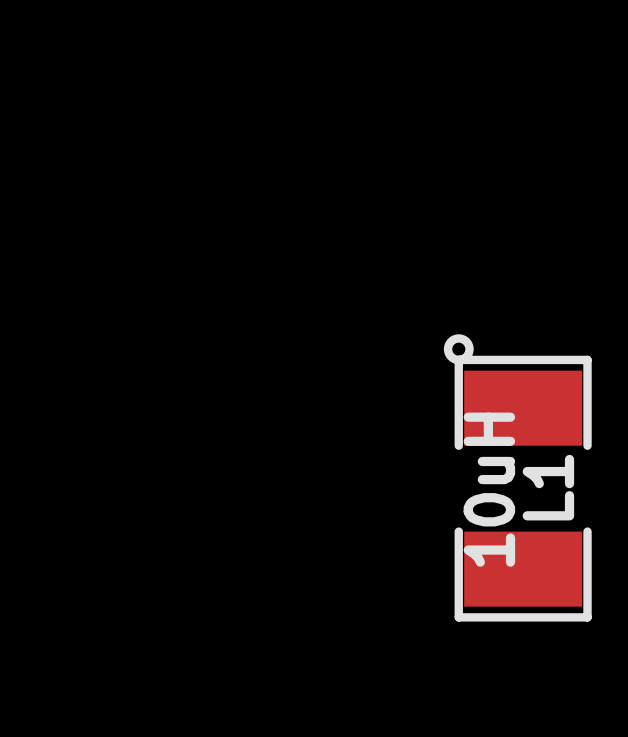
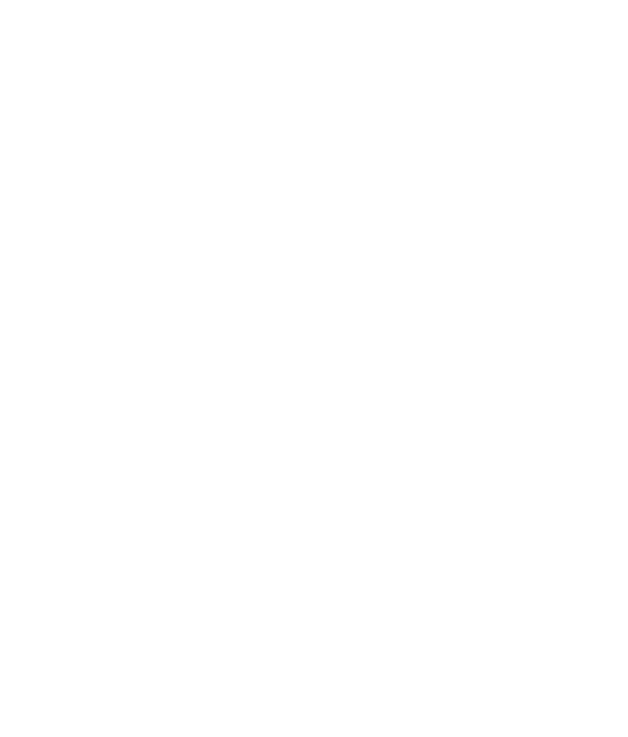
L1: 10uH (517, 477) -> none

